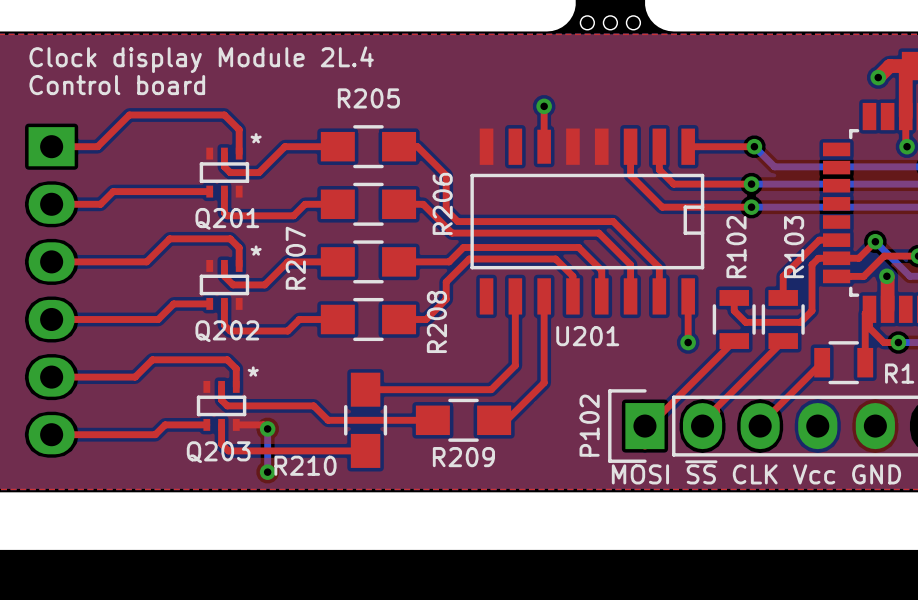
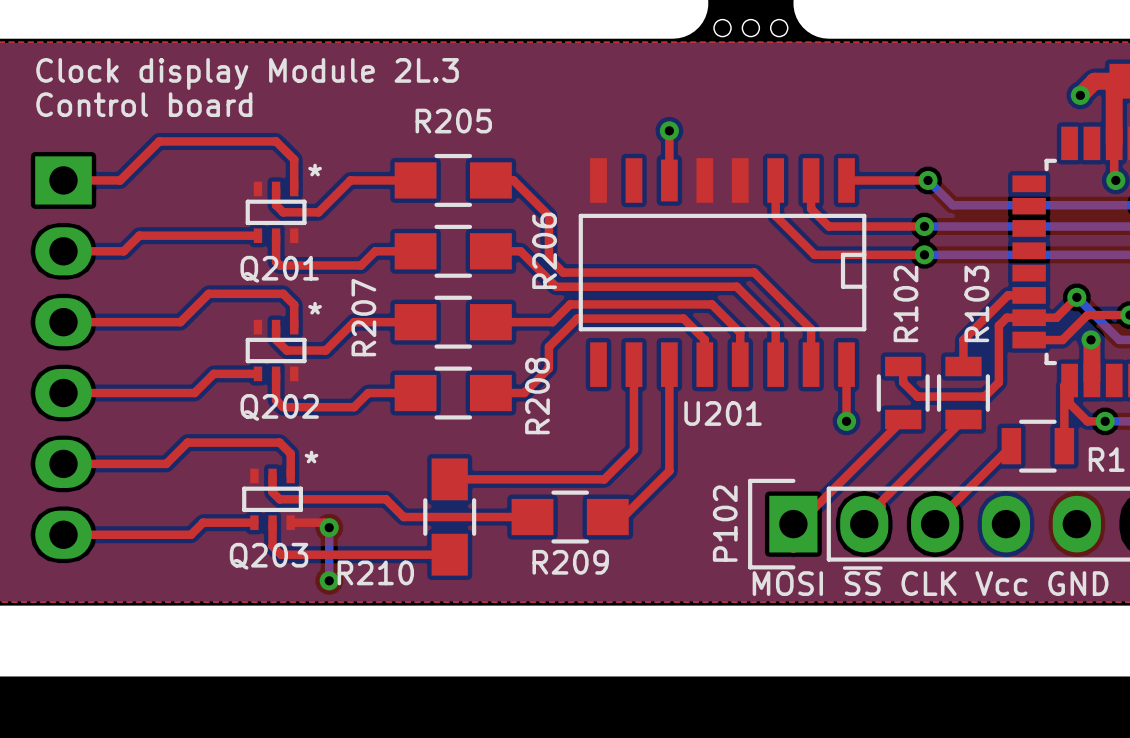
text: Clock display Module 2L.4 (201, 59) -> Clock display Module 2L.3 (247, 73)

